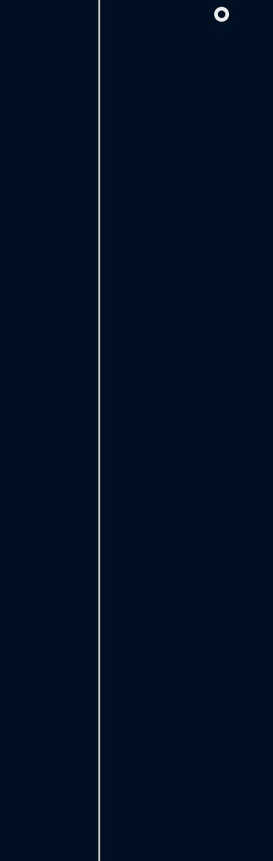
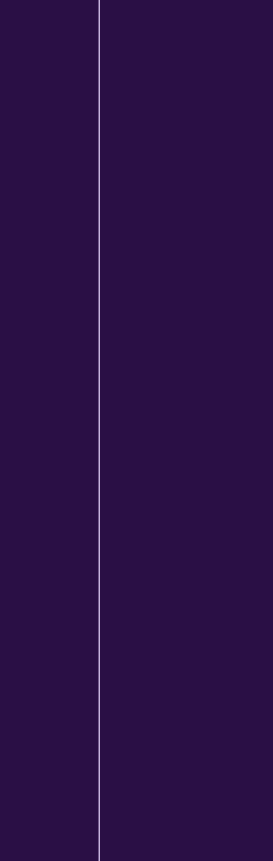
via: (221, 14) -> none

